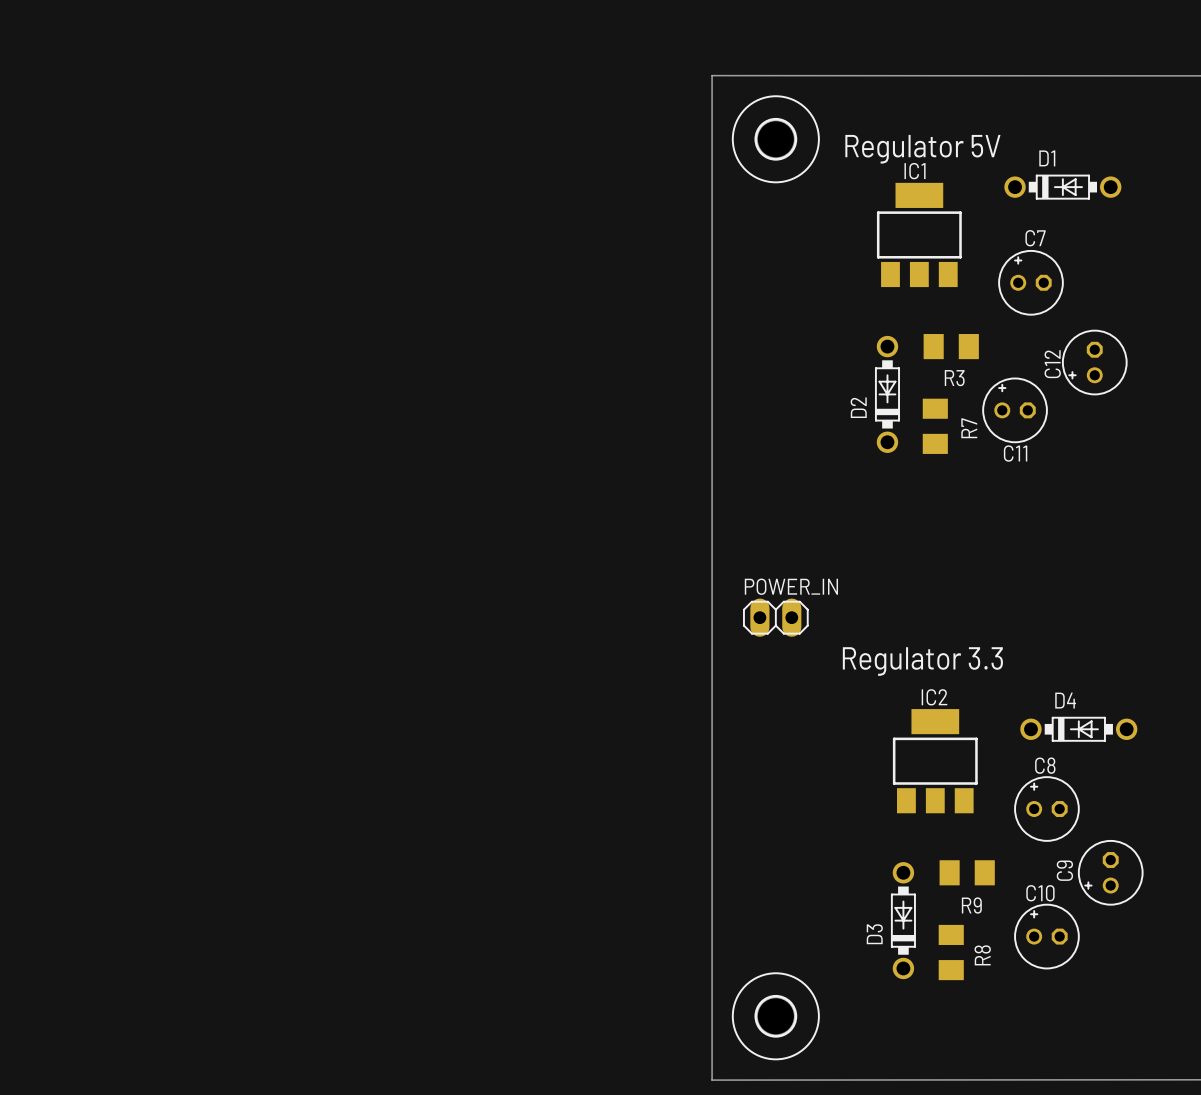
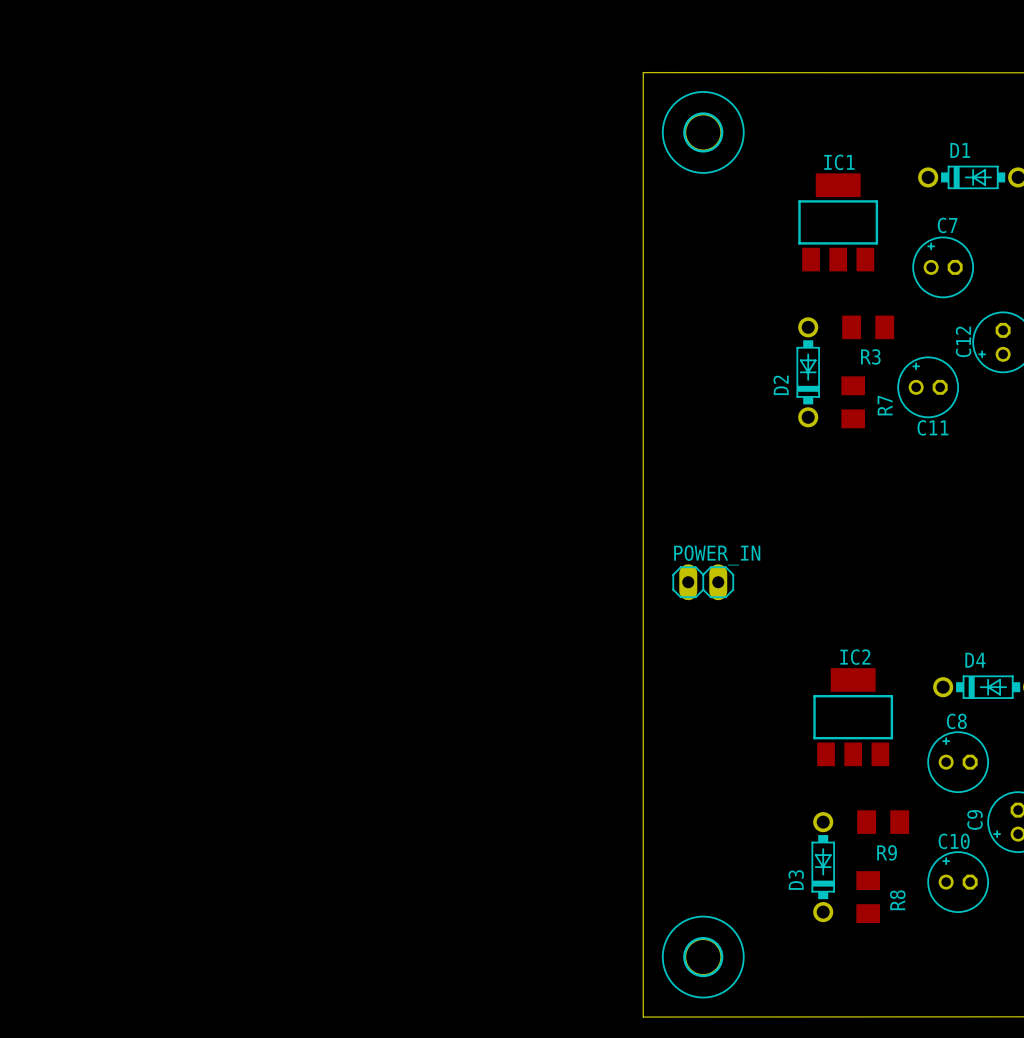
text: Regulator 5V (922, 149) -> none
text: Regulator 3.3 (922, 661) -> none

